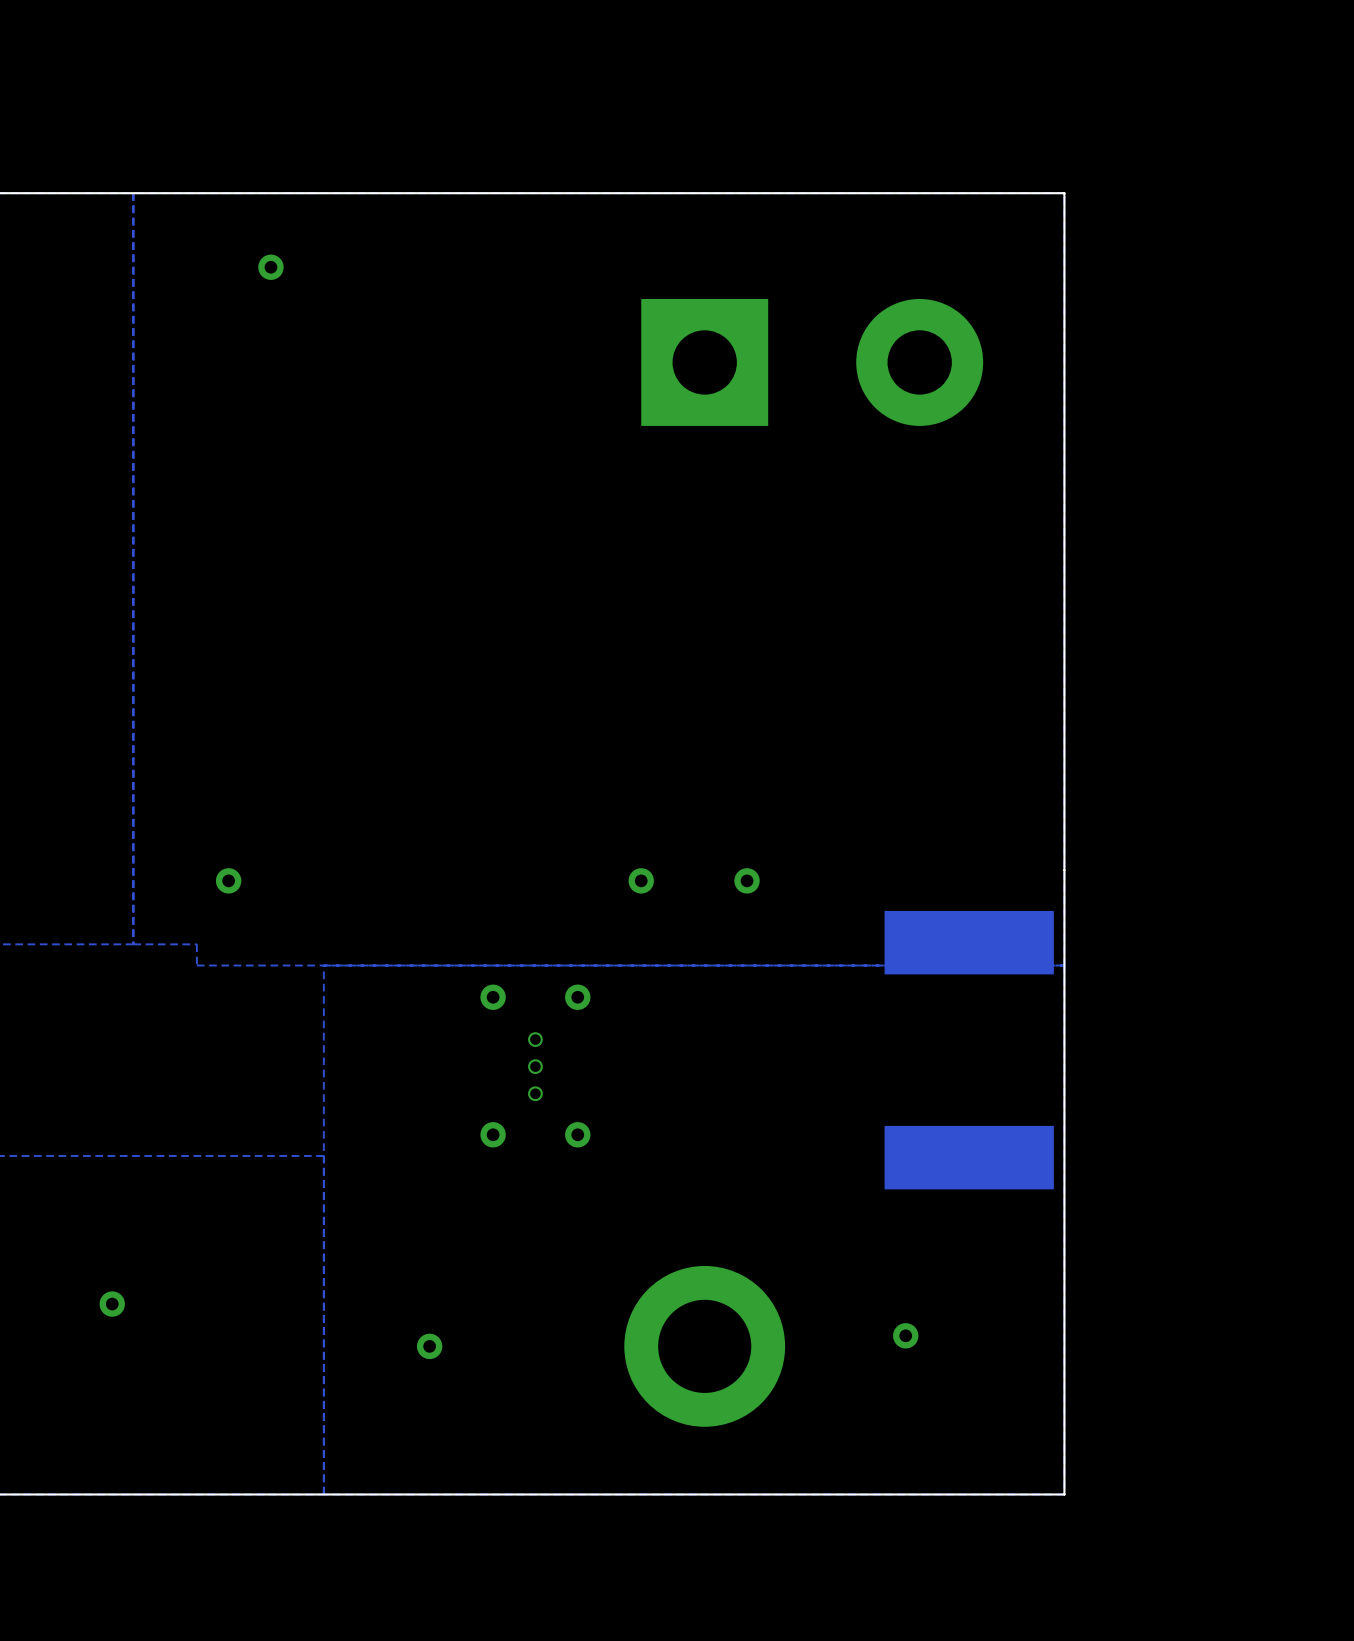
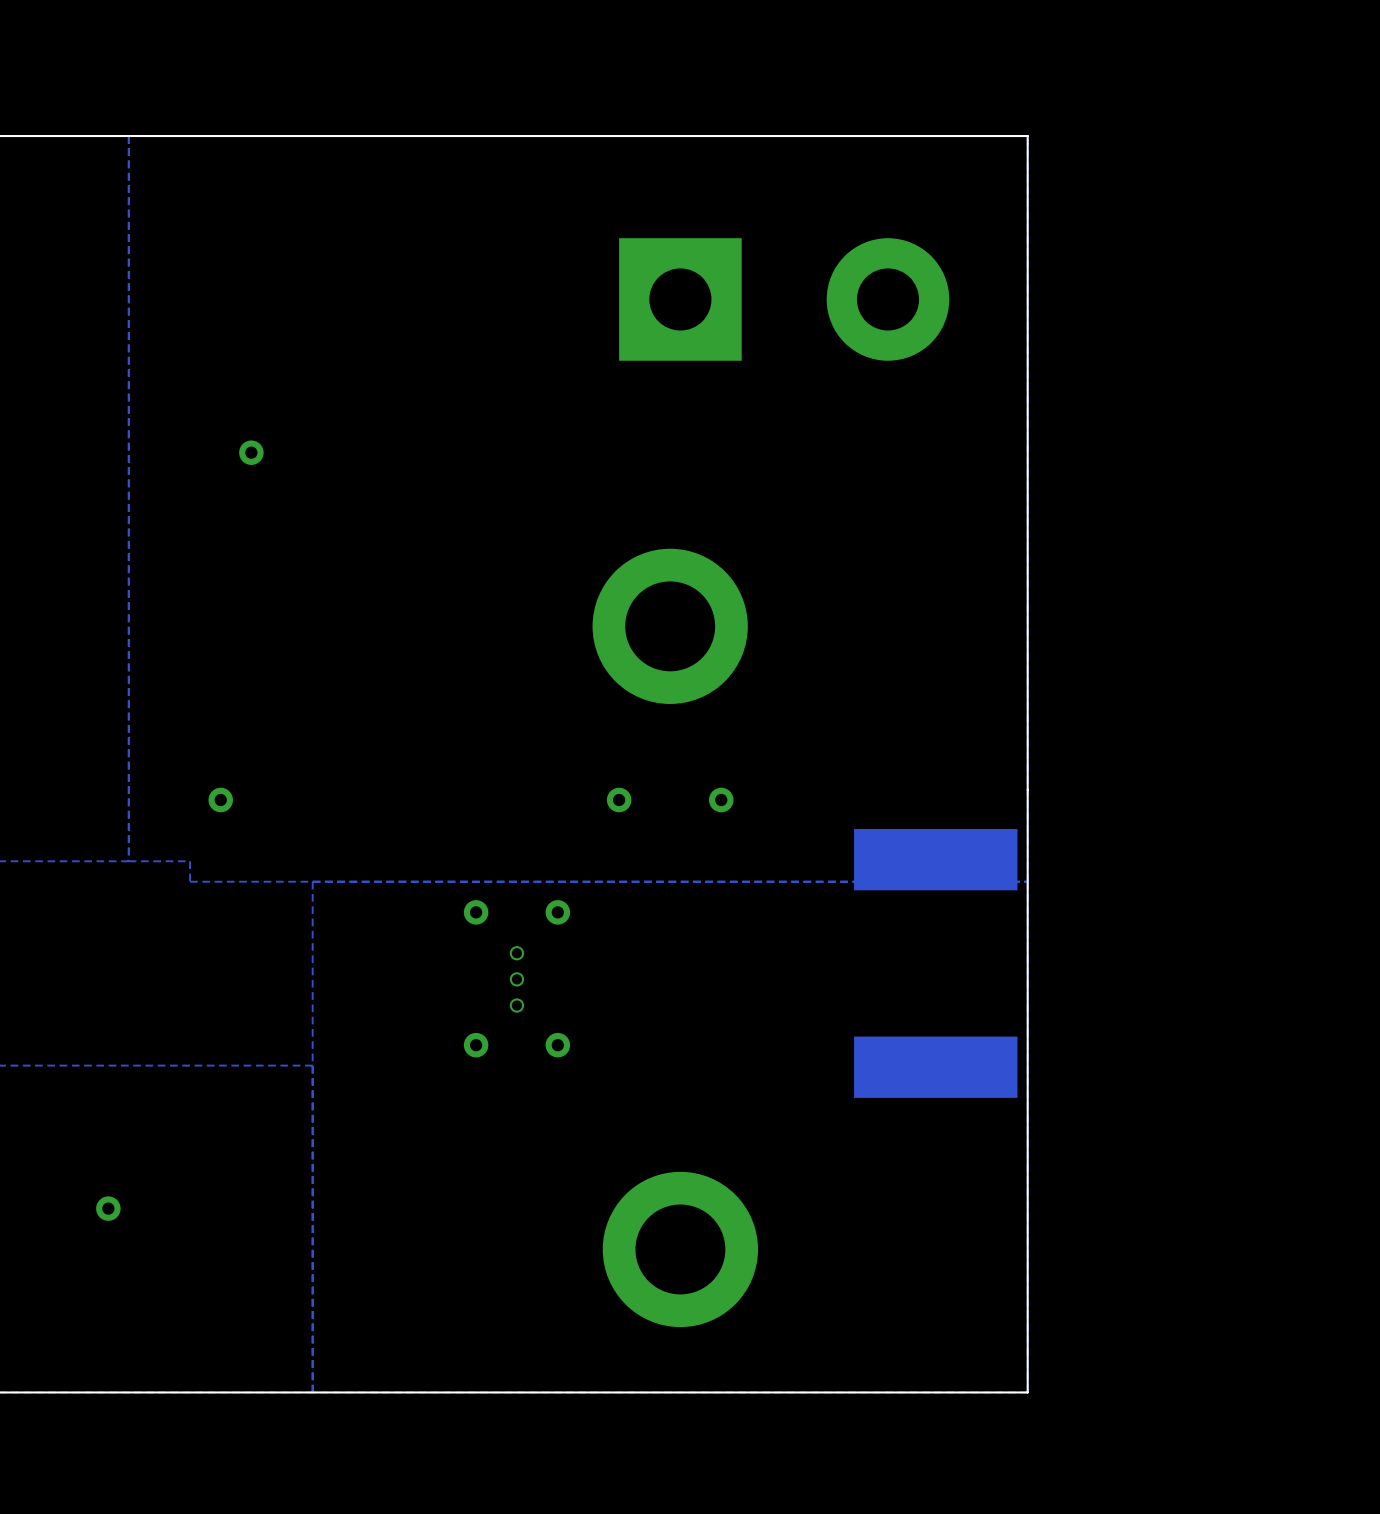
via: (270, 267) -> none
via: none -> (251, 452)
part: none -> (670, 626)
via: (905, 1335) -> none
via: (429, 1346) -> none

